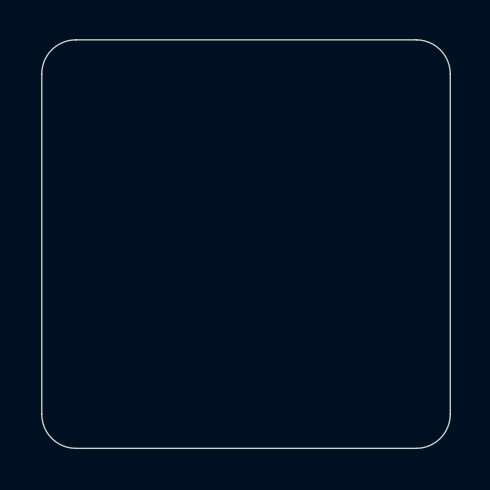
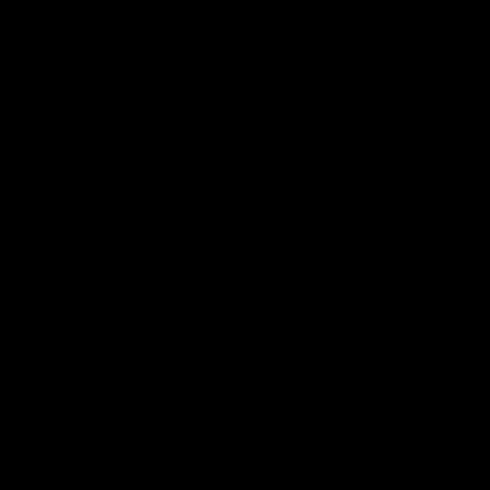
board edge: (416, 39) (75, 39) (61, 43) (51, 49) (45, 59) (41, 73) (41, 414) (44, 427) (51, 438) (62, 445) (75, 448) (416, 448) (429, 445) (440, 438) (447, 427) (450, 414) (450, 73) (447, 60) (440, 49) (429, 42) (416, 39) -> none

